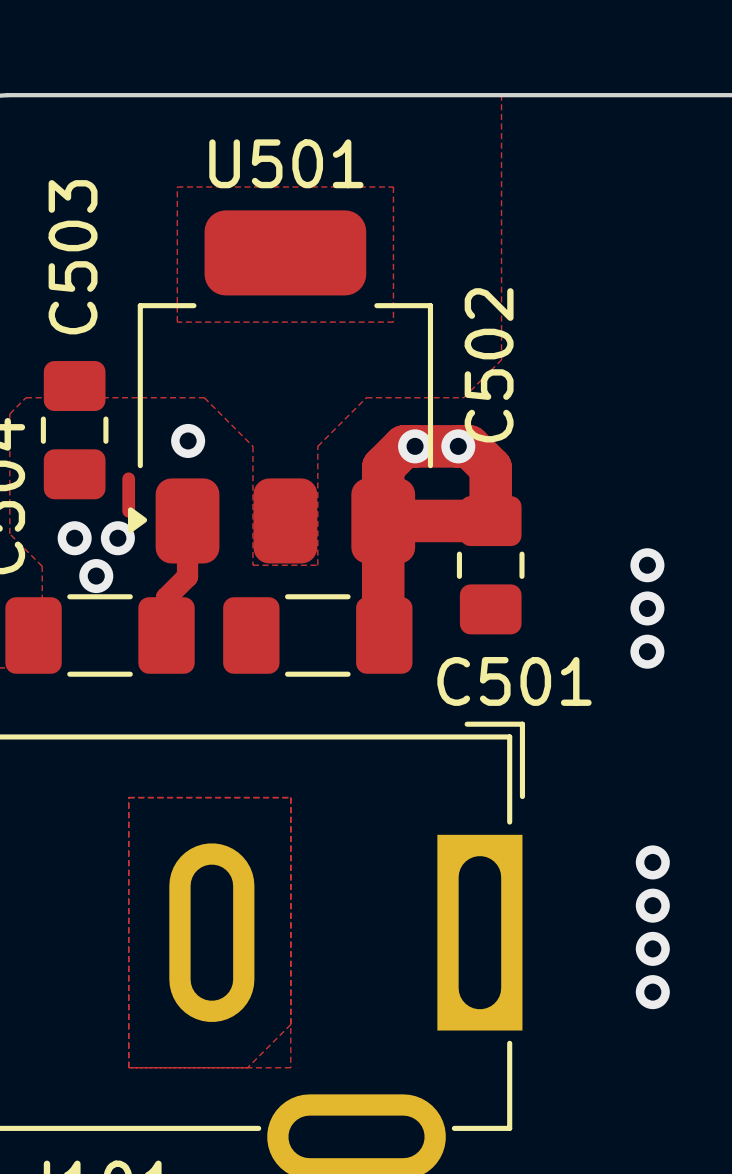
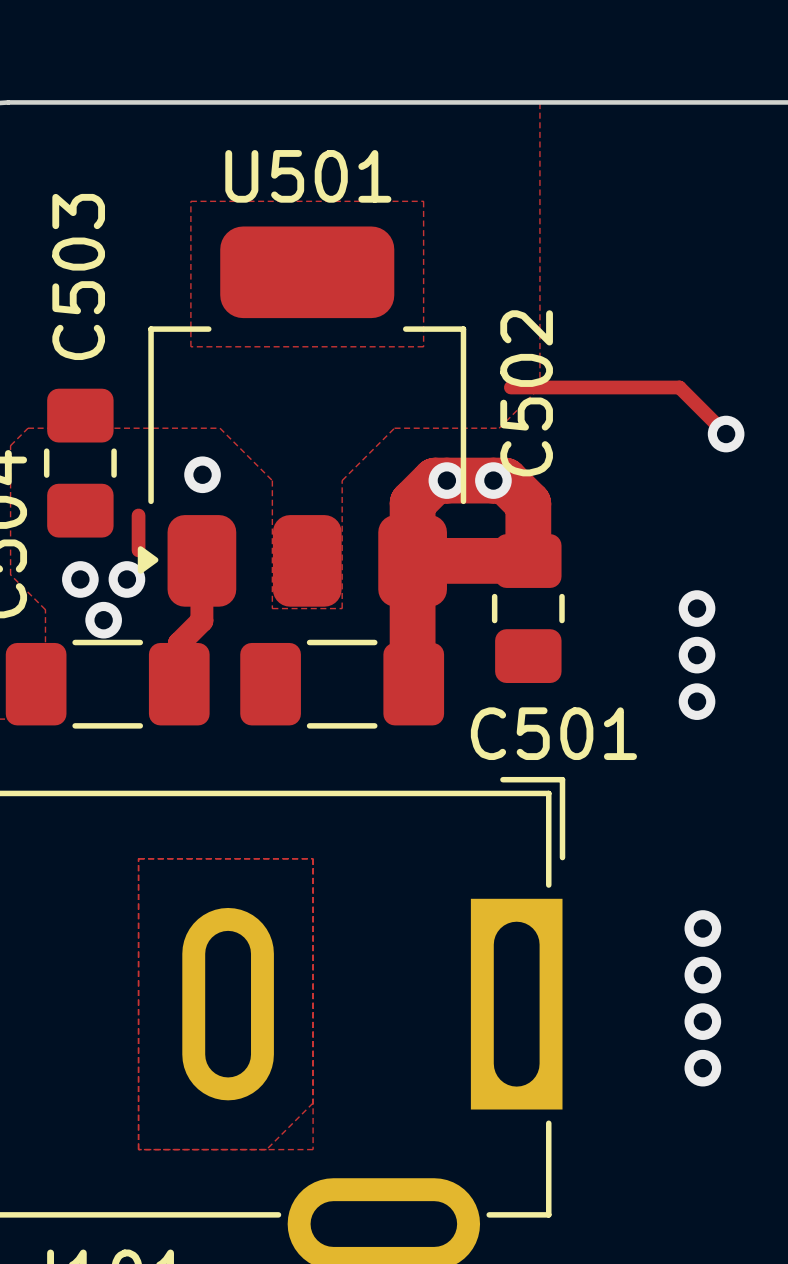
track: none -> (510, 387) (679, 387) (726, 434)
via: none -> (726, 434)

